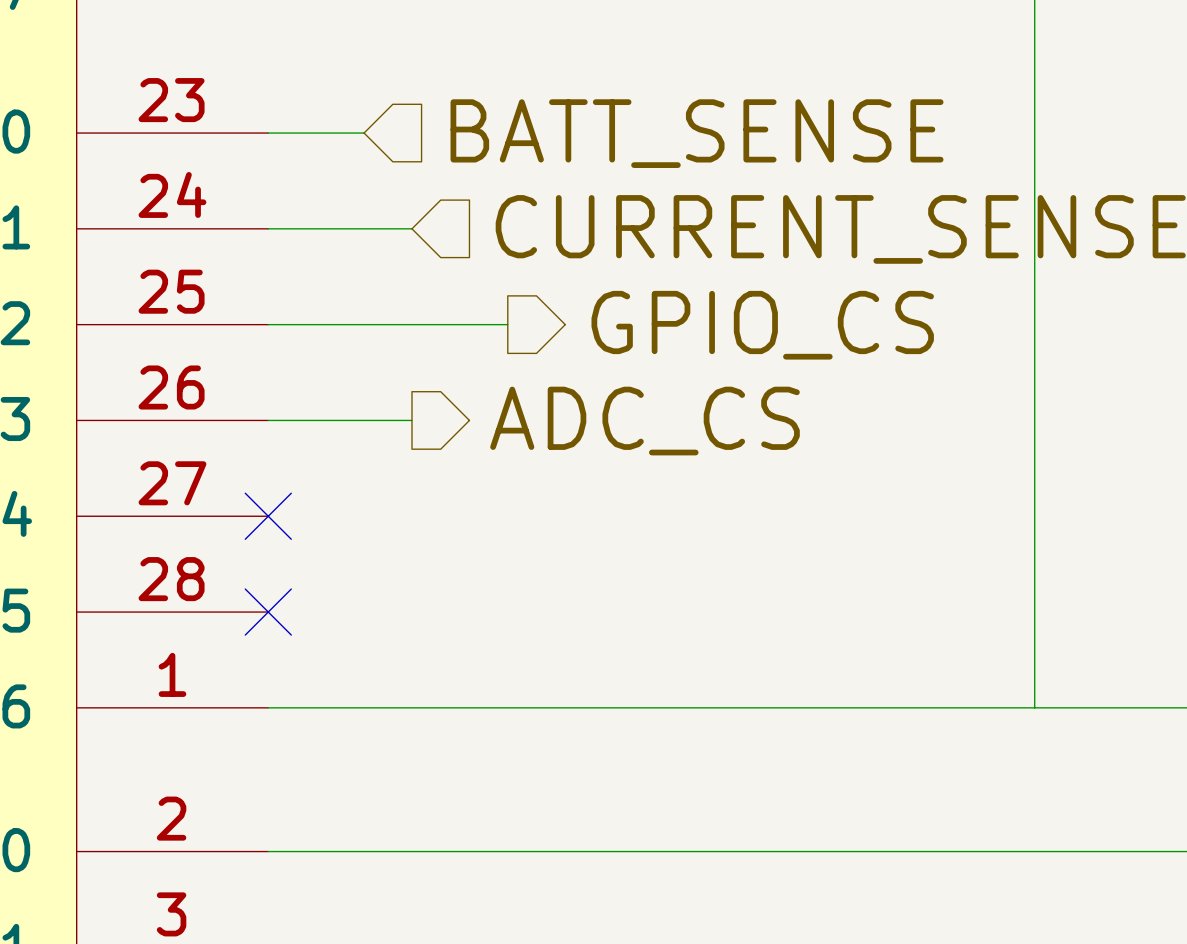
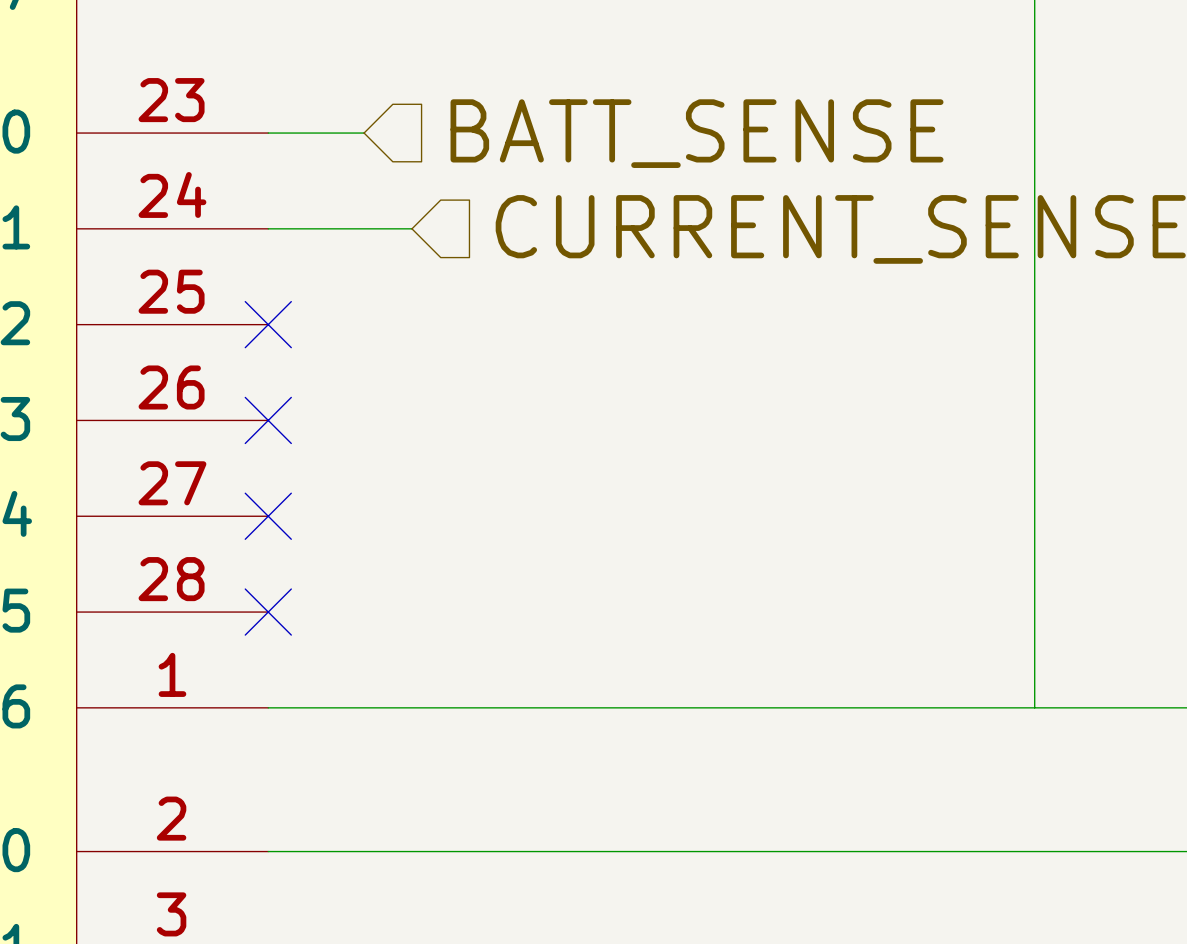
wire: (268, 324) (507, 324) -> none
no-connect mark: none -> (268, 324)
hierarchical label: GPIO_CS (762, 325) -> none
wire: (268, 420) (411, 420) -> none
no-connect mark: none -> (268, 420)
hierarchical label: ADC_CS (645, 421) -> none

